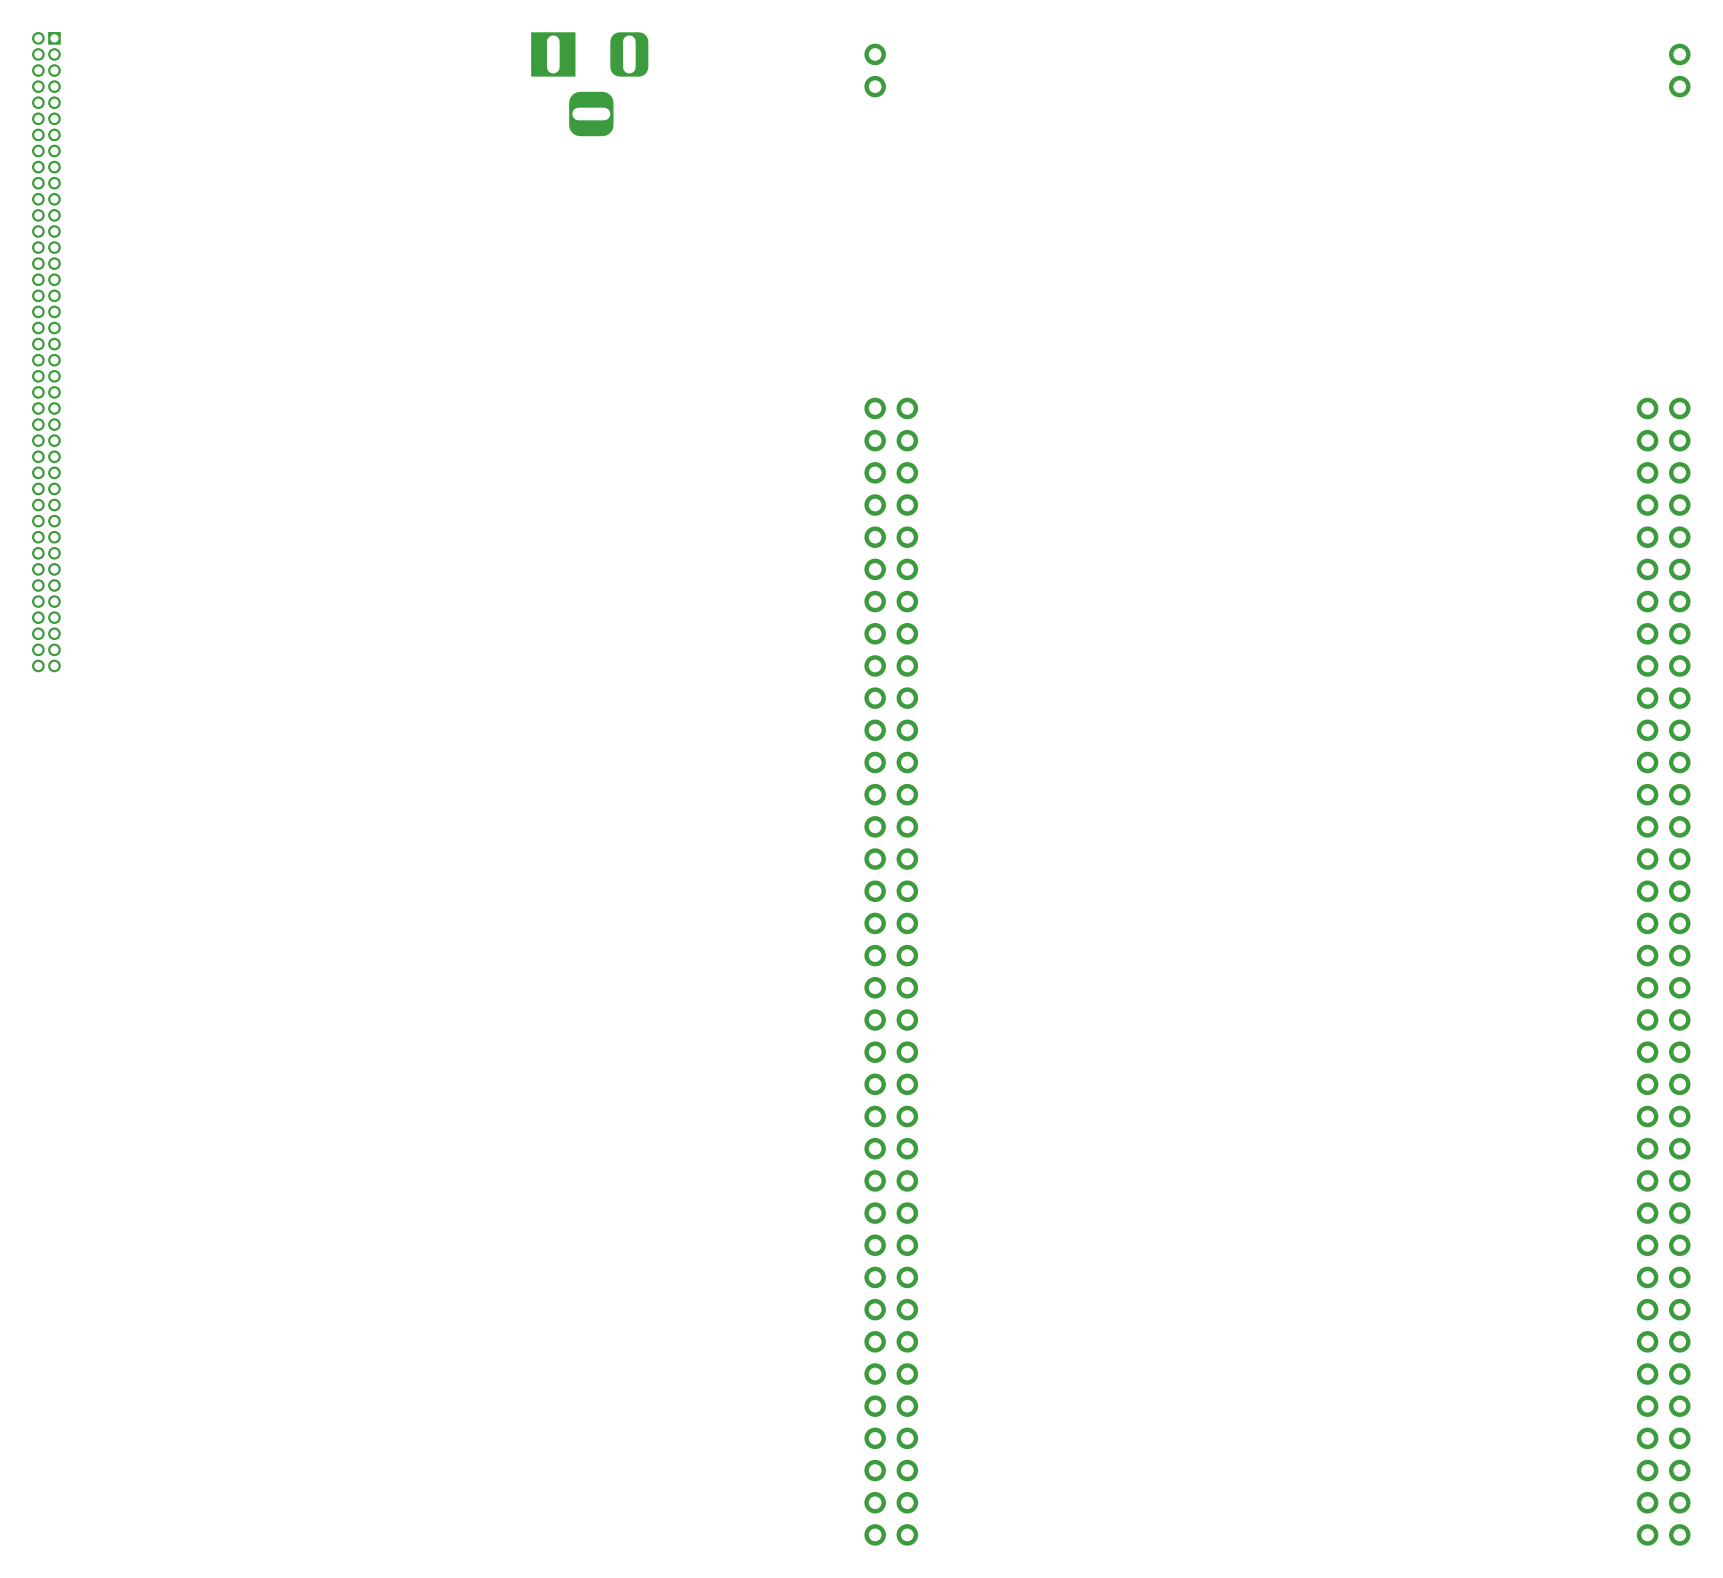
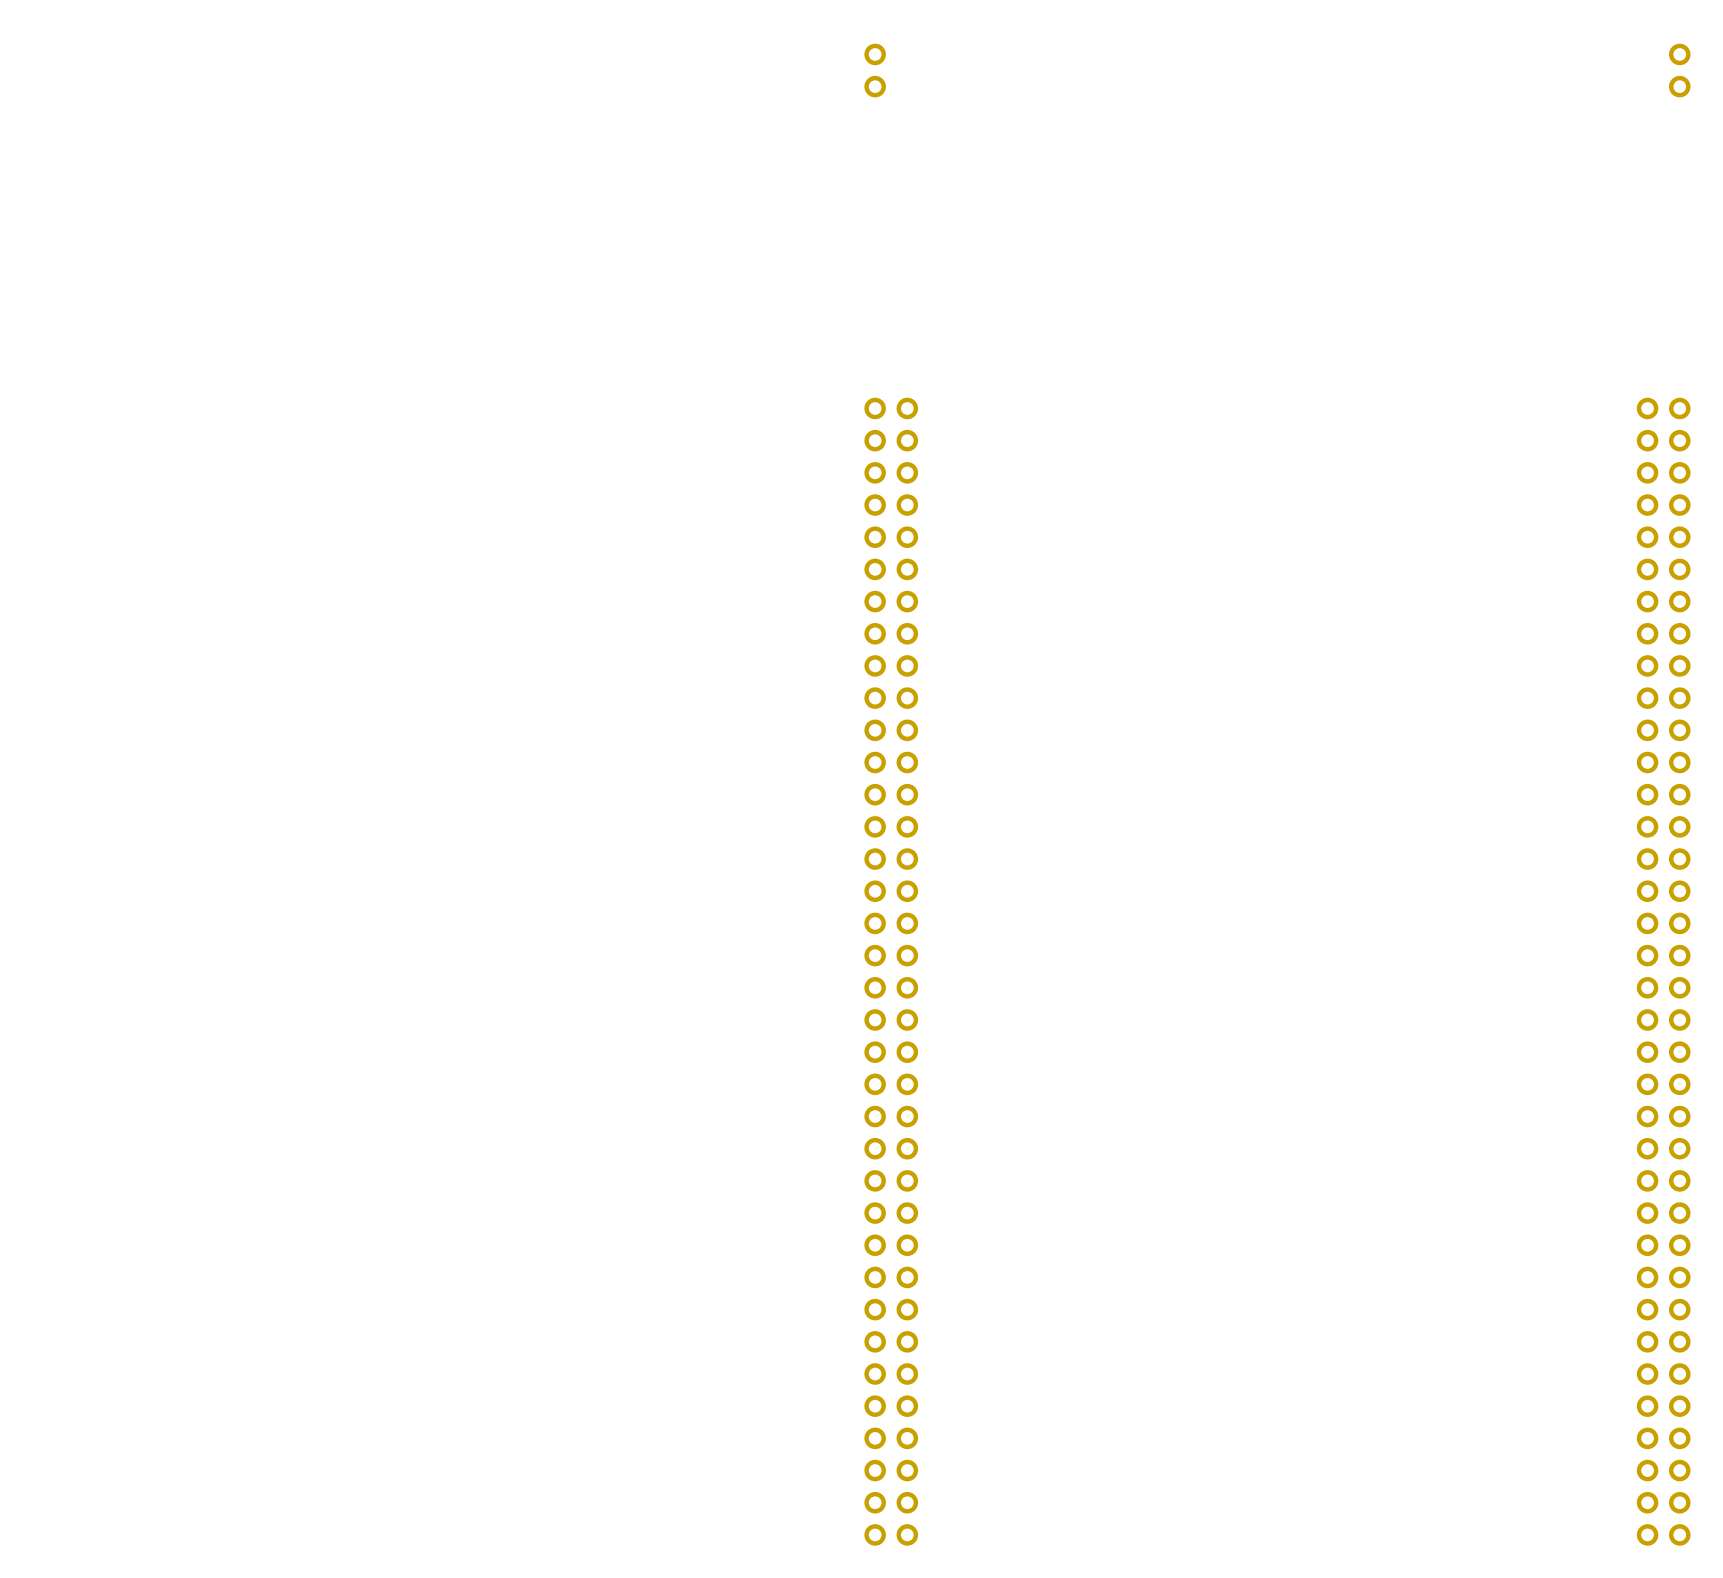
part: (589, 84) -> none
part: (46, 352) -> none

